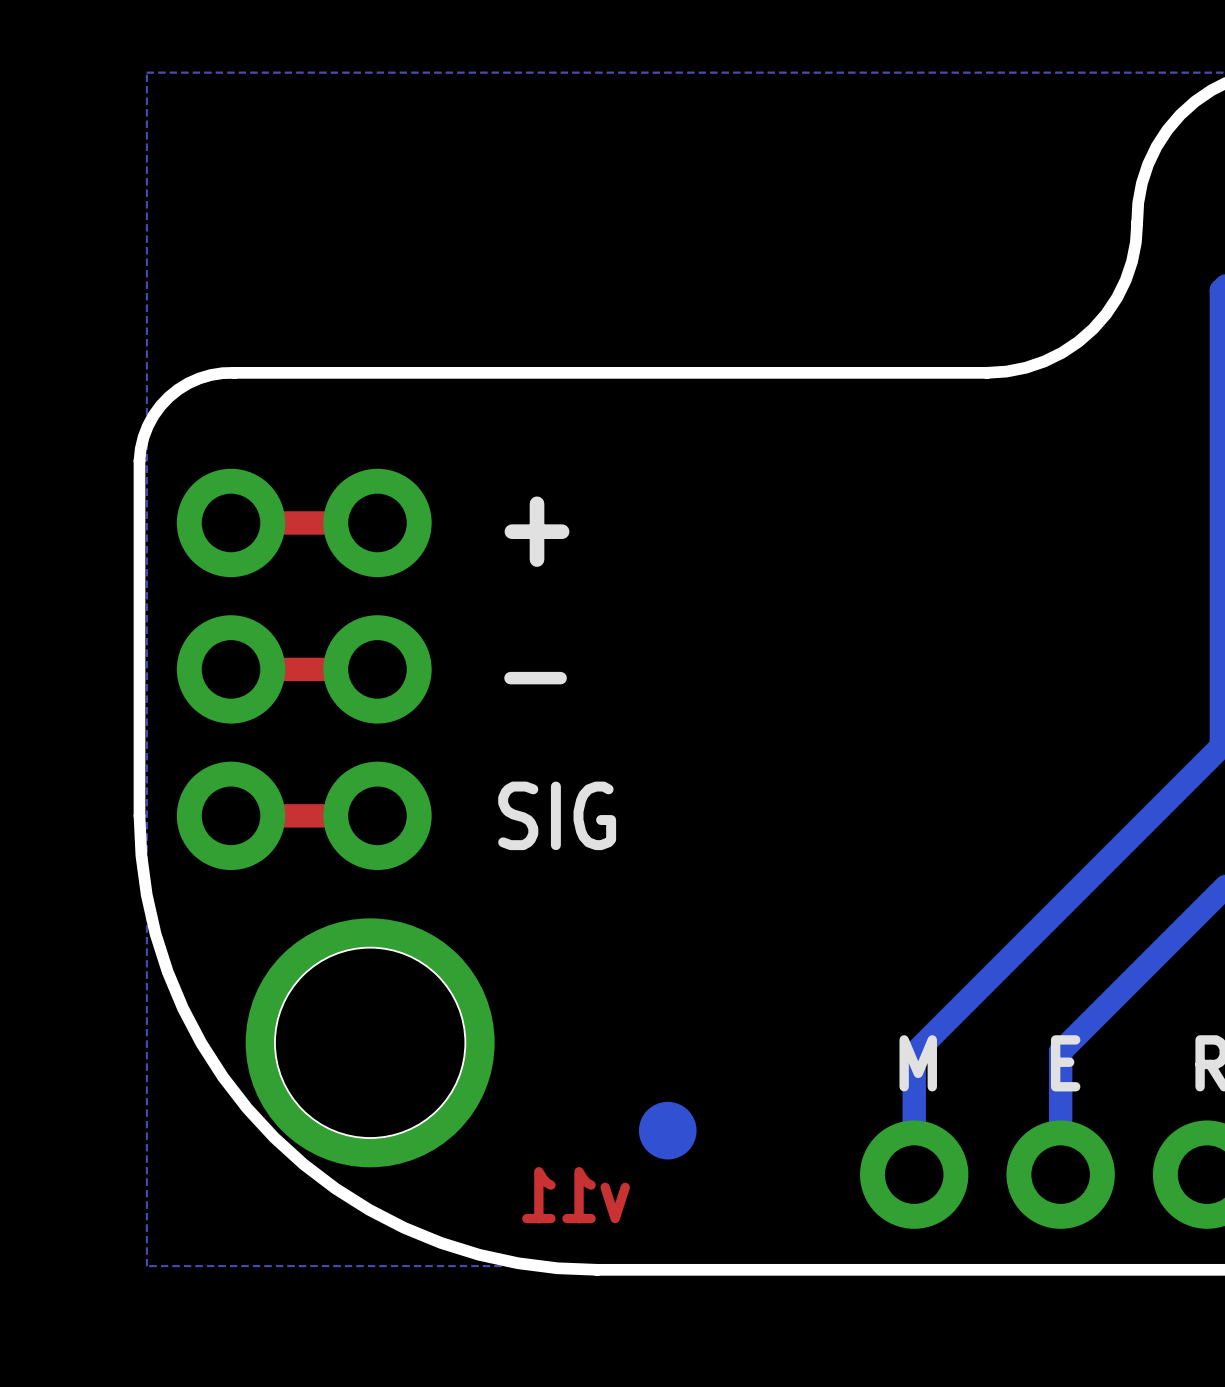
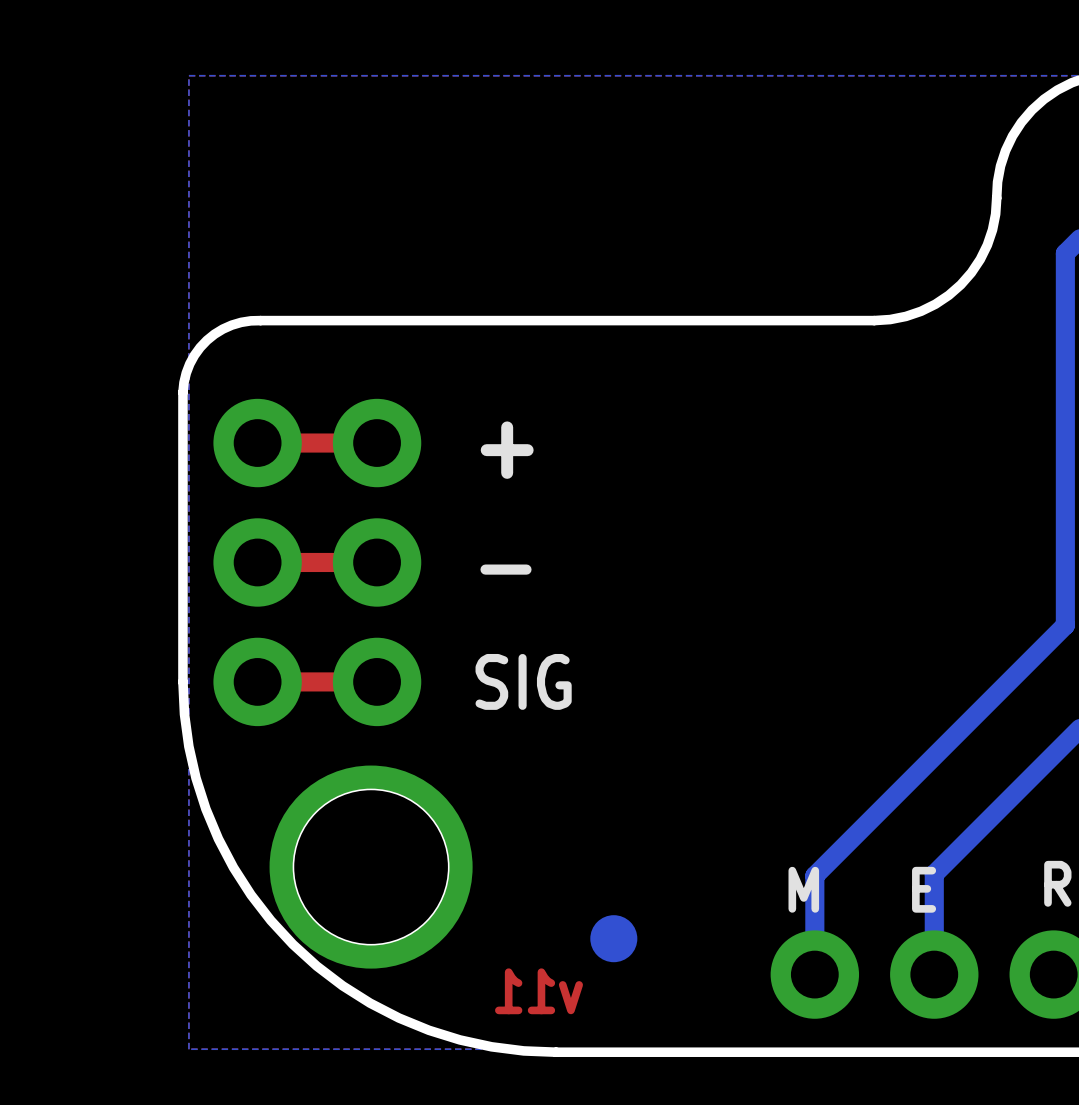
text position: M (918, 1063) -> M (803, 889)
text position: E (1065, 1063) -> E (924, 889)

